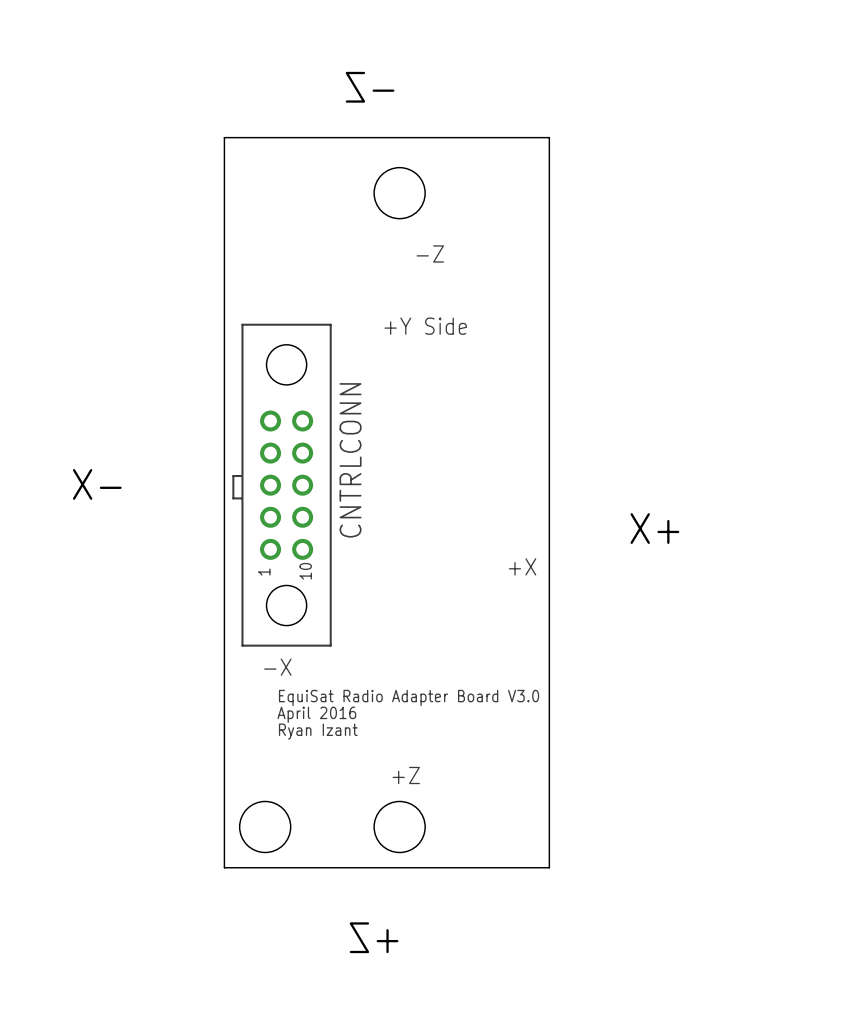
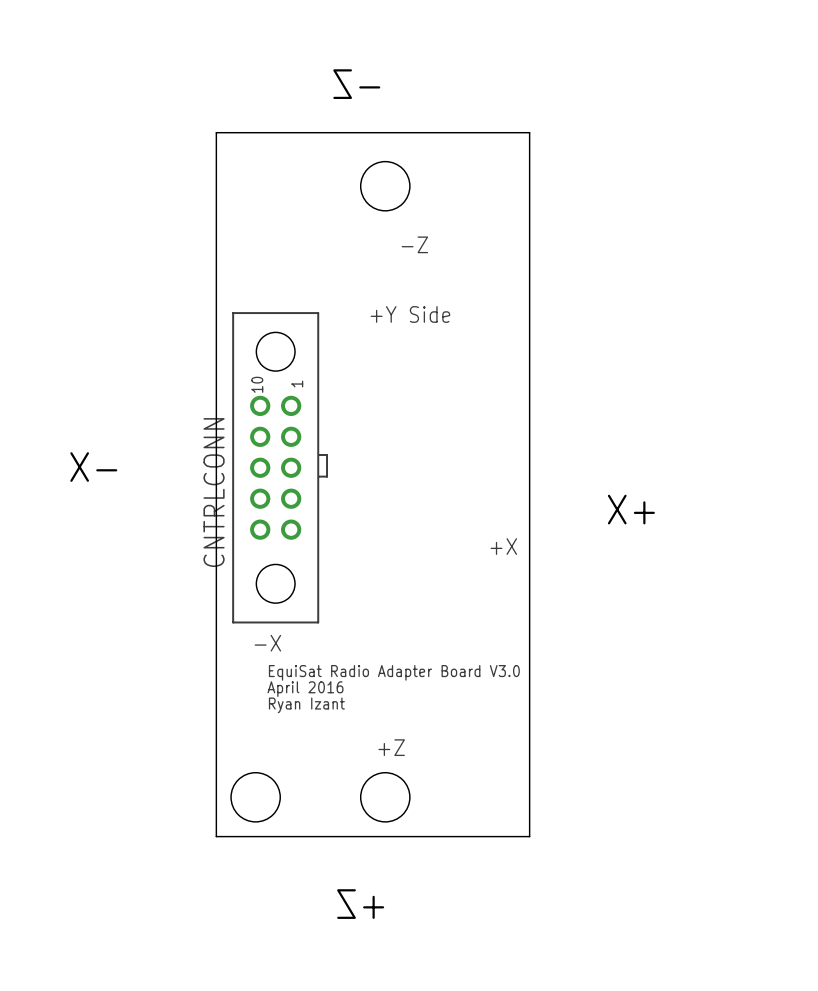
CNTRLCONN footprint: [232, 323, 332, 647] -> [232, 312, 329, 624]
CNTRLCONN name position: CNTRLCONN (350, 460) -> CNTRLCONN (214, 492)

